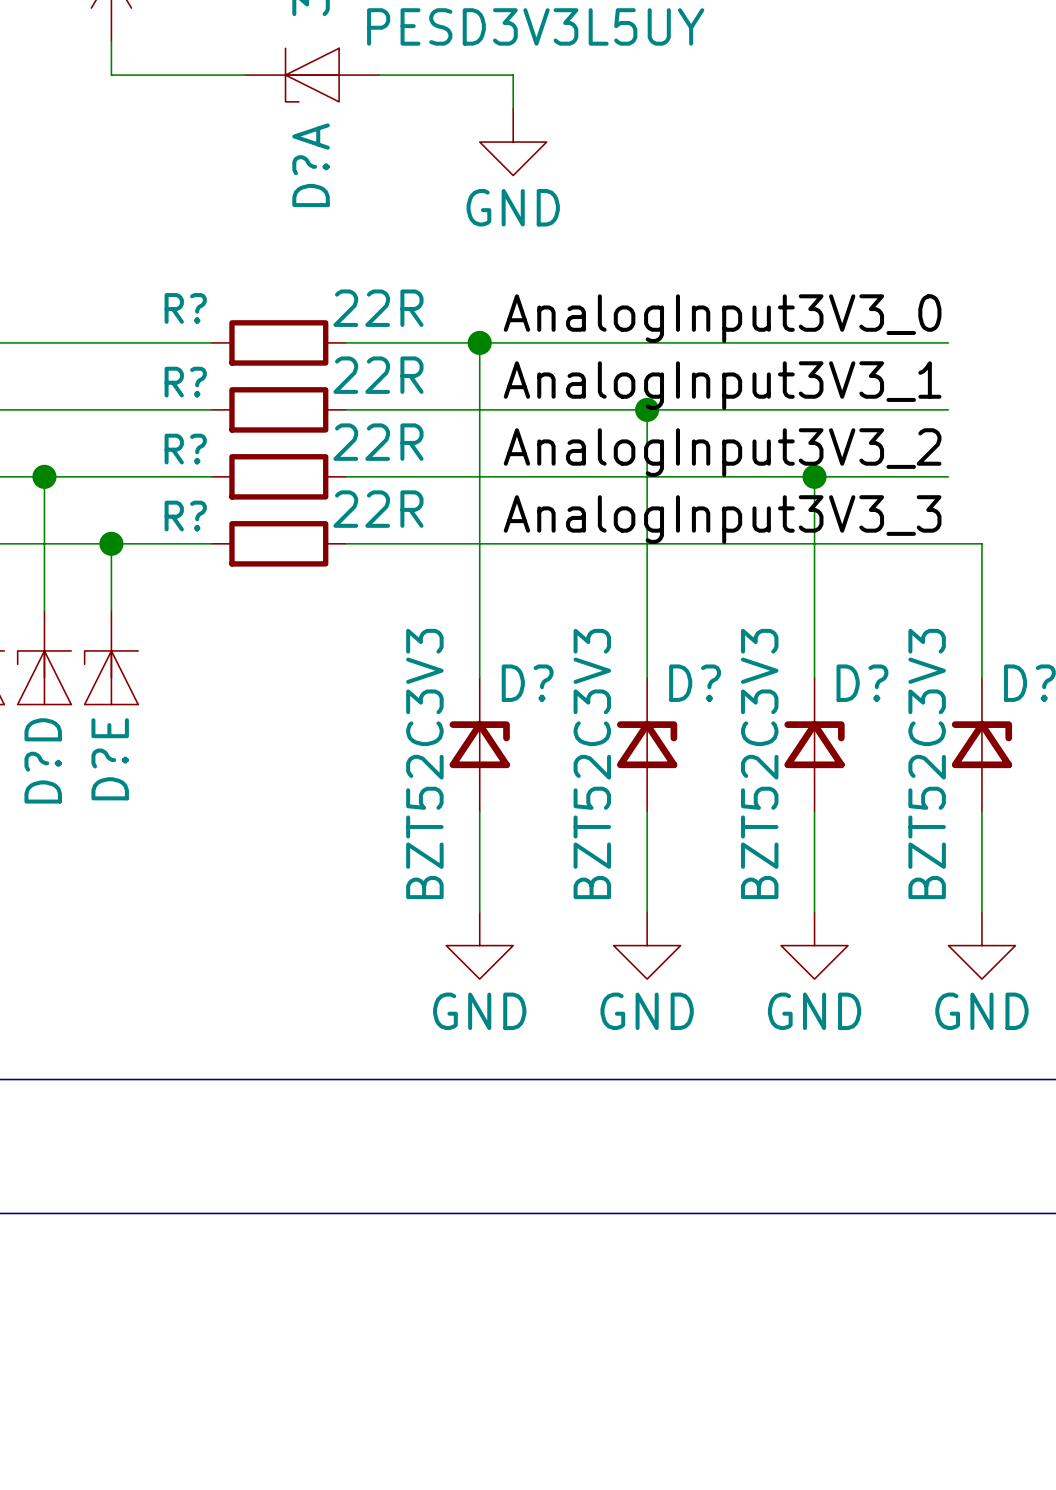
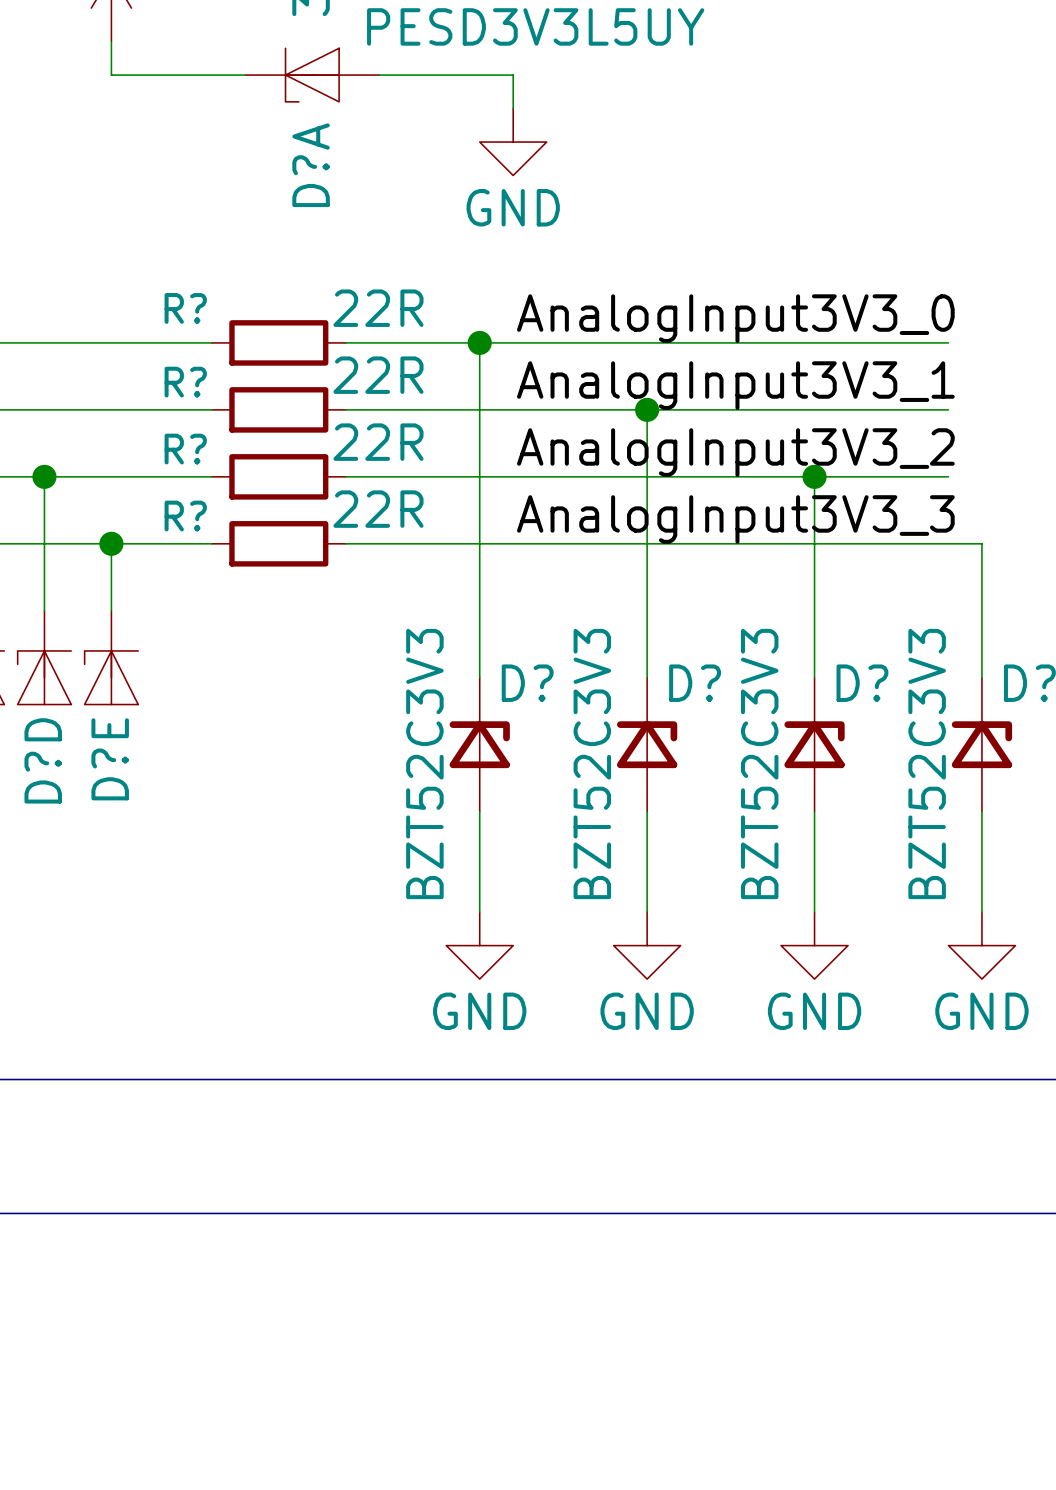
label position: AnalogInput3V3_0 (722, 318) -> AnalogInput3V3_0 (735, 318)
label position: AnalogInput3V3_1 (722, 385) -> AnalogInput3V3_1 (735, 385)
label position: AnalogInput3V3_2 (722, 452) -> AnalogInput3V3_2 (735, 452)
label position: AnalogInput3V3_3 (722, 519) -> AnalogInput3V3_3 (735, 519)

